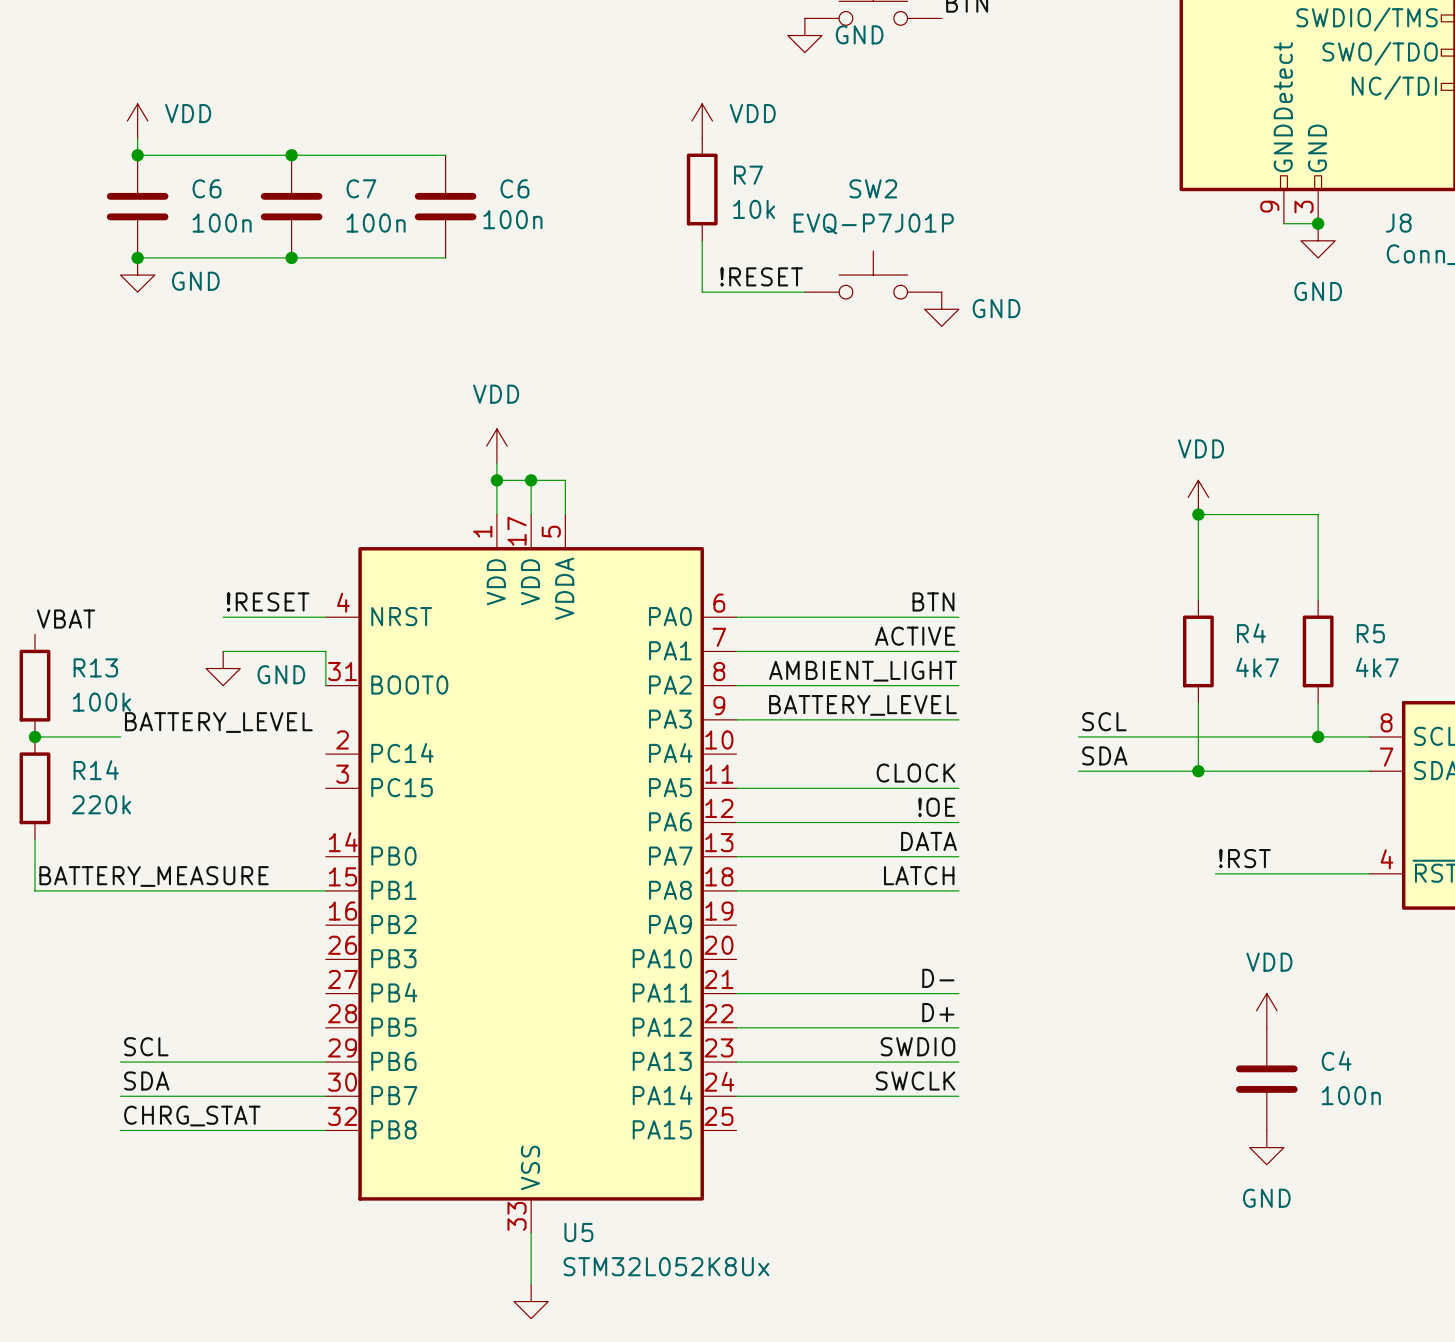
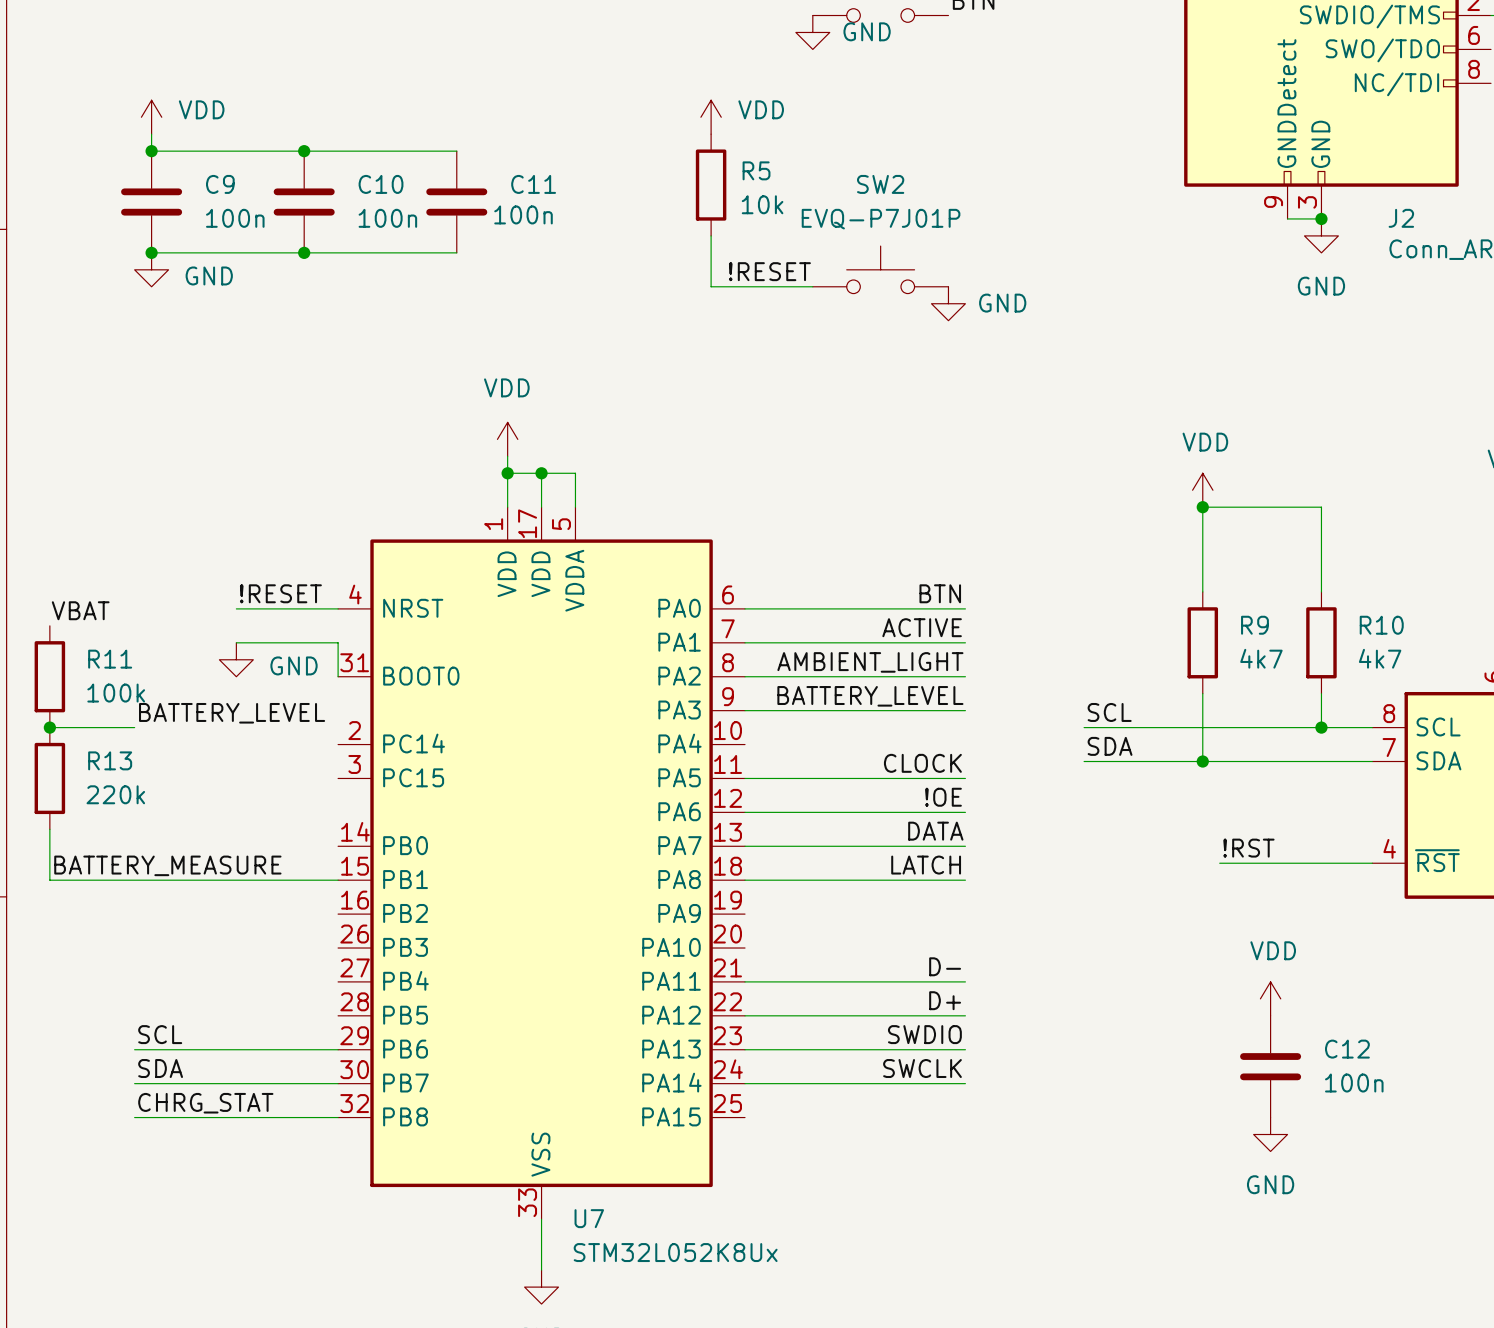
R7 name: R7 (748, 175) -> R5 (756, 170)
C6 name: C6 (207, 188) -> C9 (220, 184)
C7 name: C7 (361, 188) -> C10 (381, 184)
C6 name: C6 (514, 188) -> C11 (533, 184)
J8 name: J8 (1398, 223) -> J2 (1401, 218)
R4 name: R4 (1251, 633) -> R9 (1254, 625)
R5 name: R5 (1370, 633) -> R10 (1381, 625)
R13 name: R13 (95, 667) -> R11 (110, 659)
R14 name: R14 (96, 770) -> R13 (110, 760)
C4 name: C4 (1336, 1060) -> C12 (1347, 1049)
U5 name: U5 (578, 1232) -> U7 (589, 1218)

